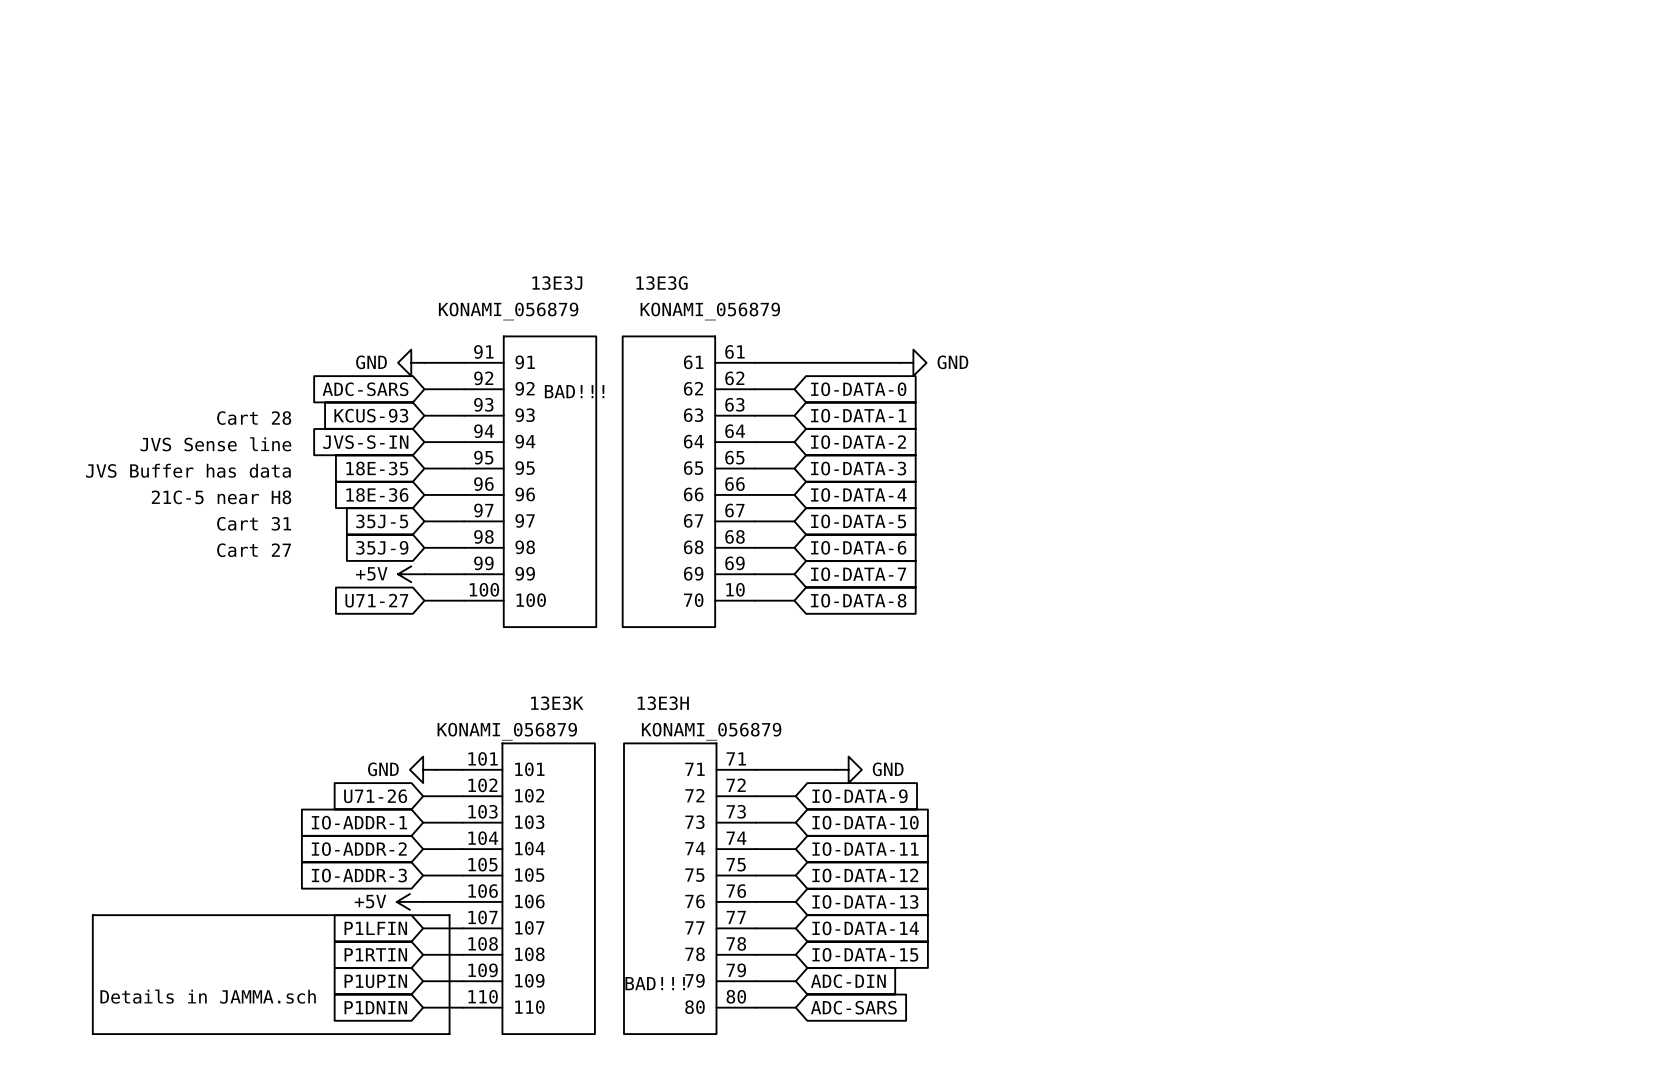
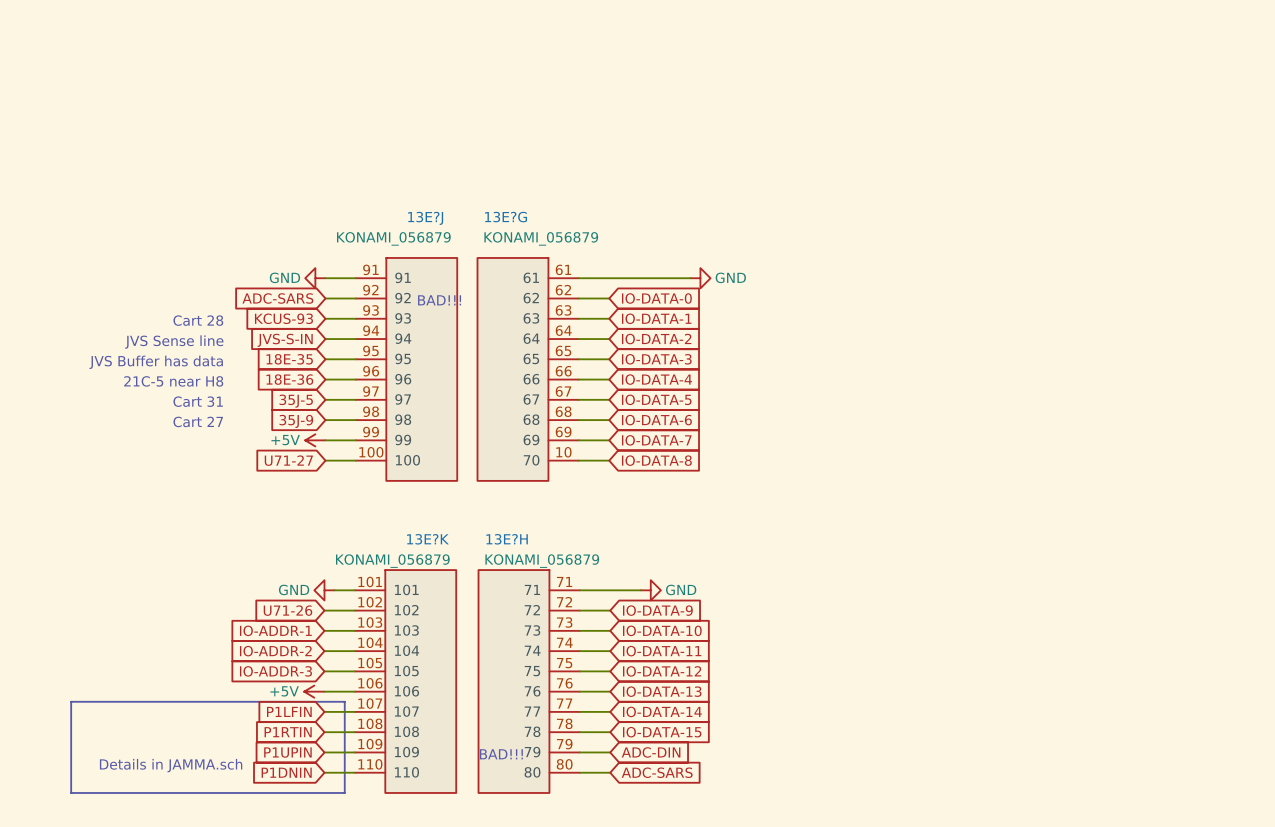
13E3J name: 13E3J (557, 283) -> 13E?J (425, 218)
13E3G name: 13E3G (661, 283) -> 13E?G (506, 217)
13E3K name: 13E3K (557, 703) -> 13E?K (427, 539)
13E3H name: 13E3H (663, 703) -> 13E?H (507, 539)

